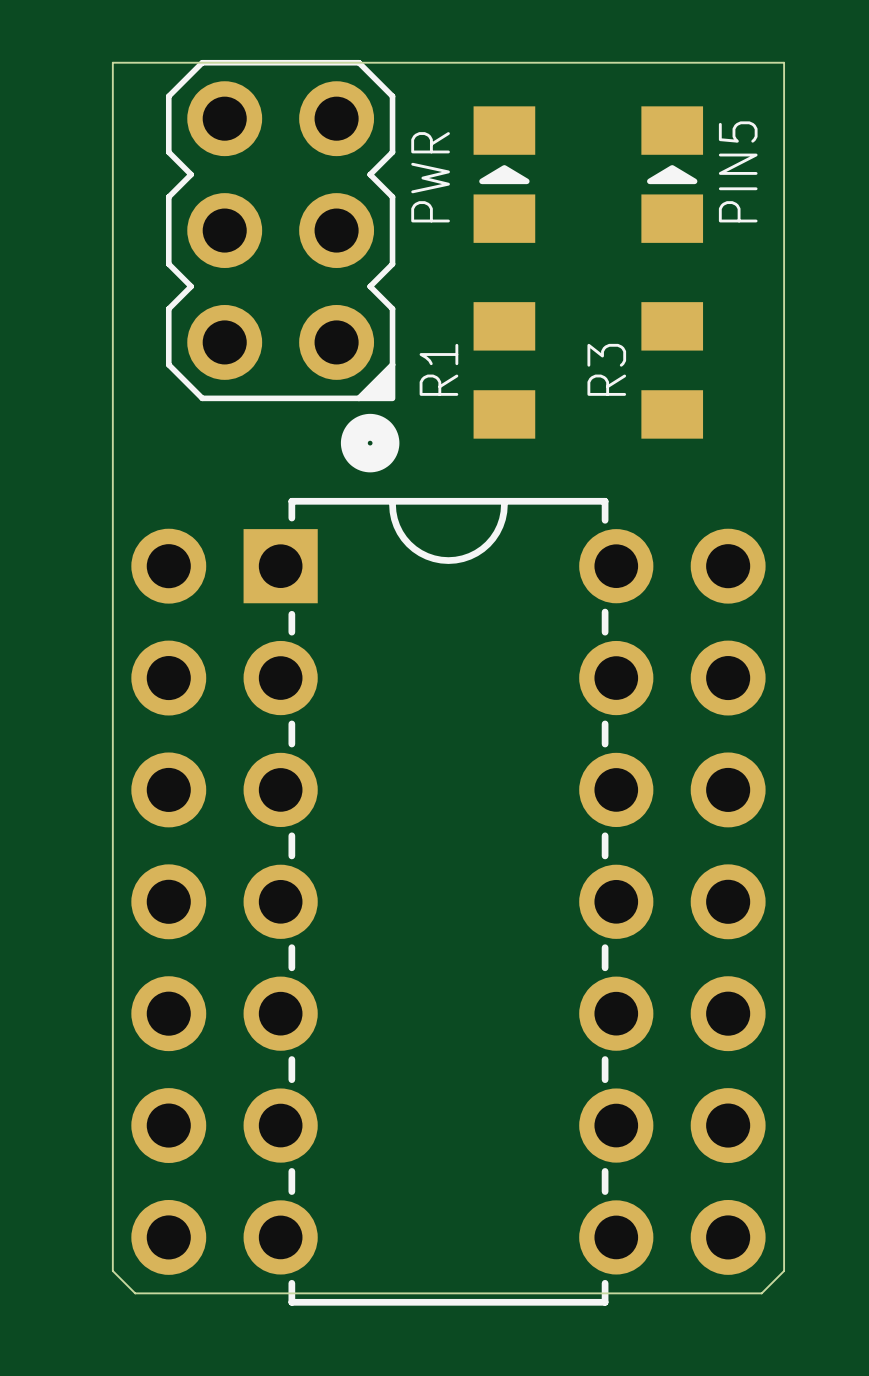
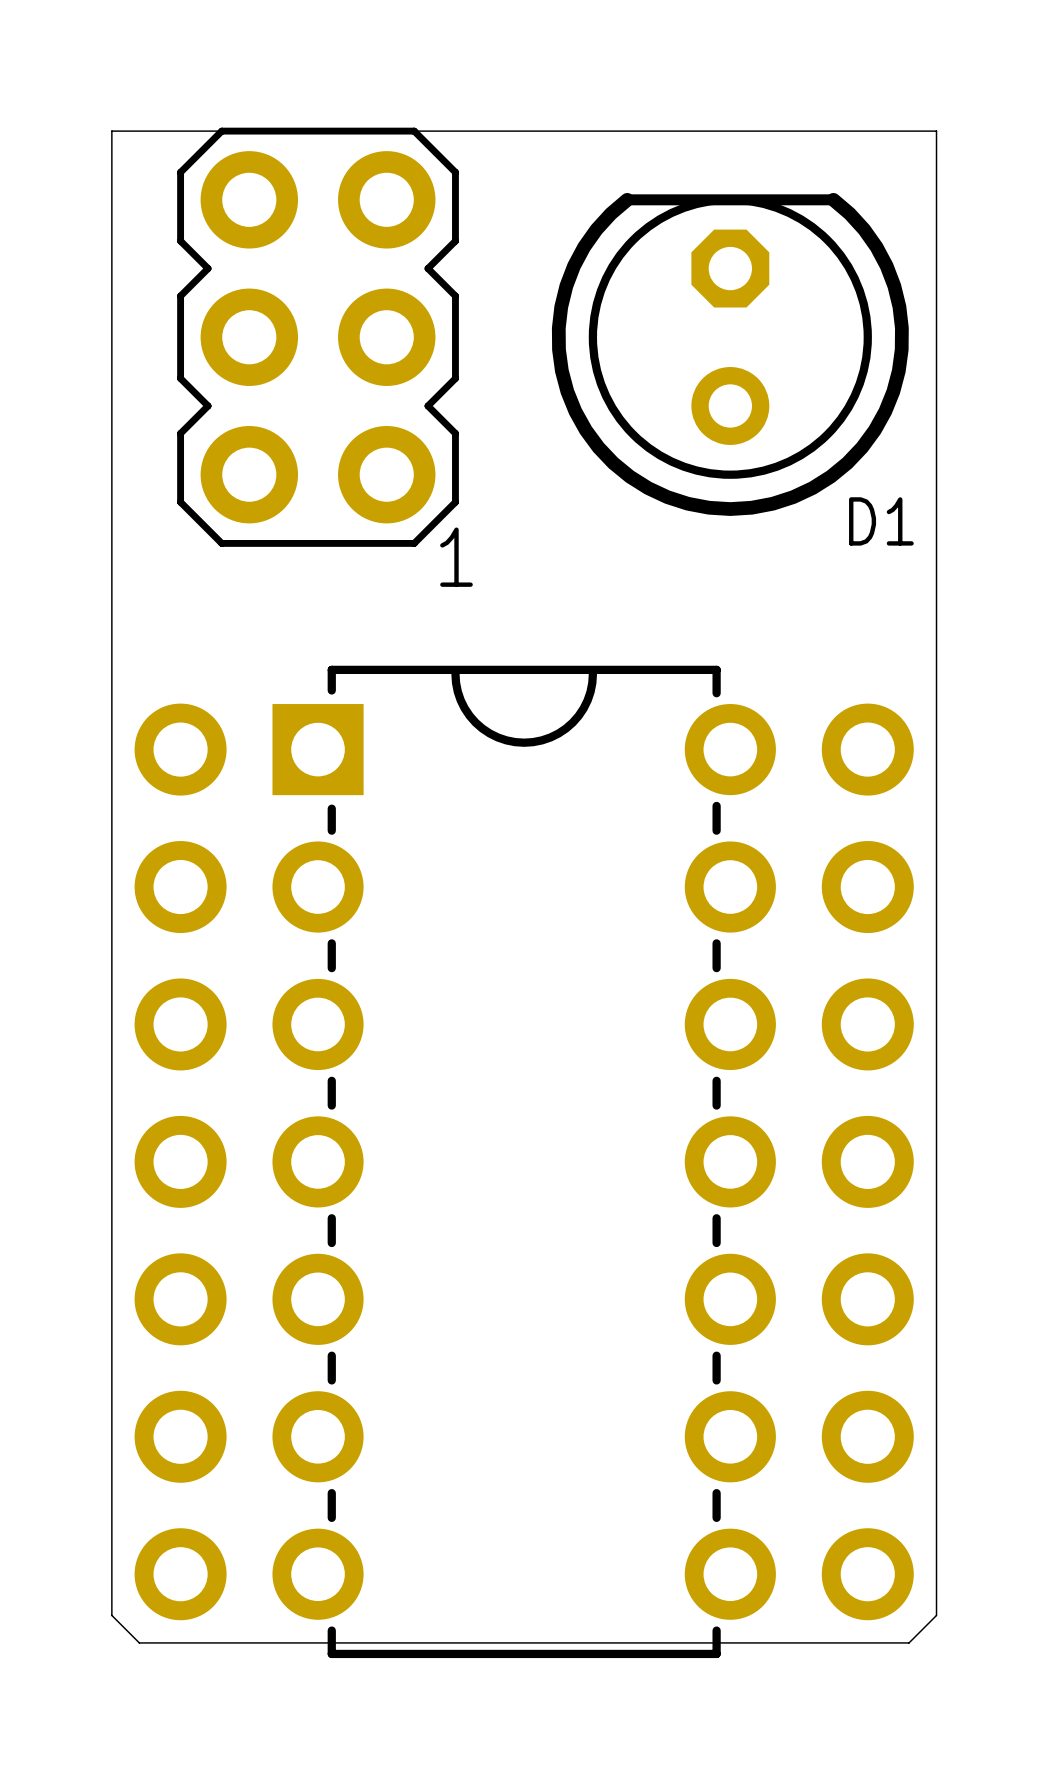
part footprint: [165, 59, 396, 402] -> [177, 127, 459, 547]
text: PIN5 (738, 171) -> none
part: (504, 174) -> none
part: (672, 174) -> none
text: PWR (430, 177) -> none
D1: none -> (730, 354)
R1: (504, 370) -> none
R3: (672, 370) -> none
drawing: [340, 413, 400, 473] -> none

